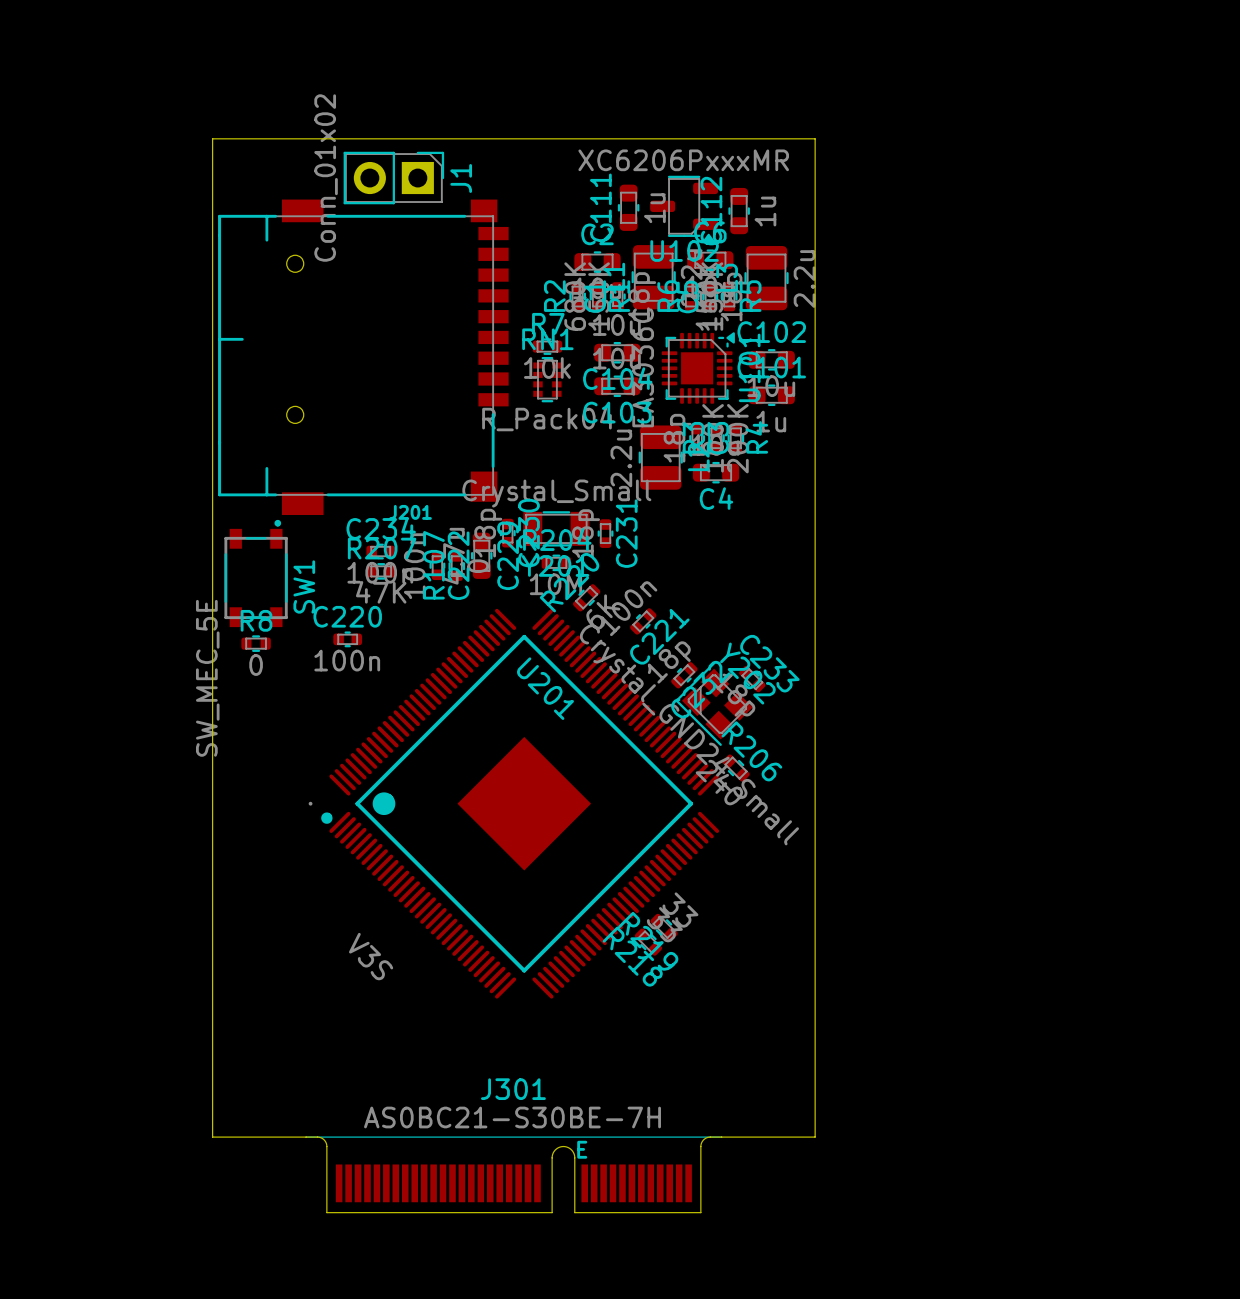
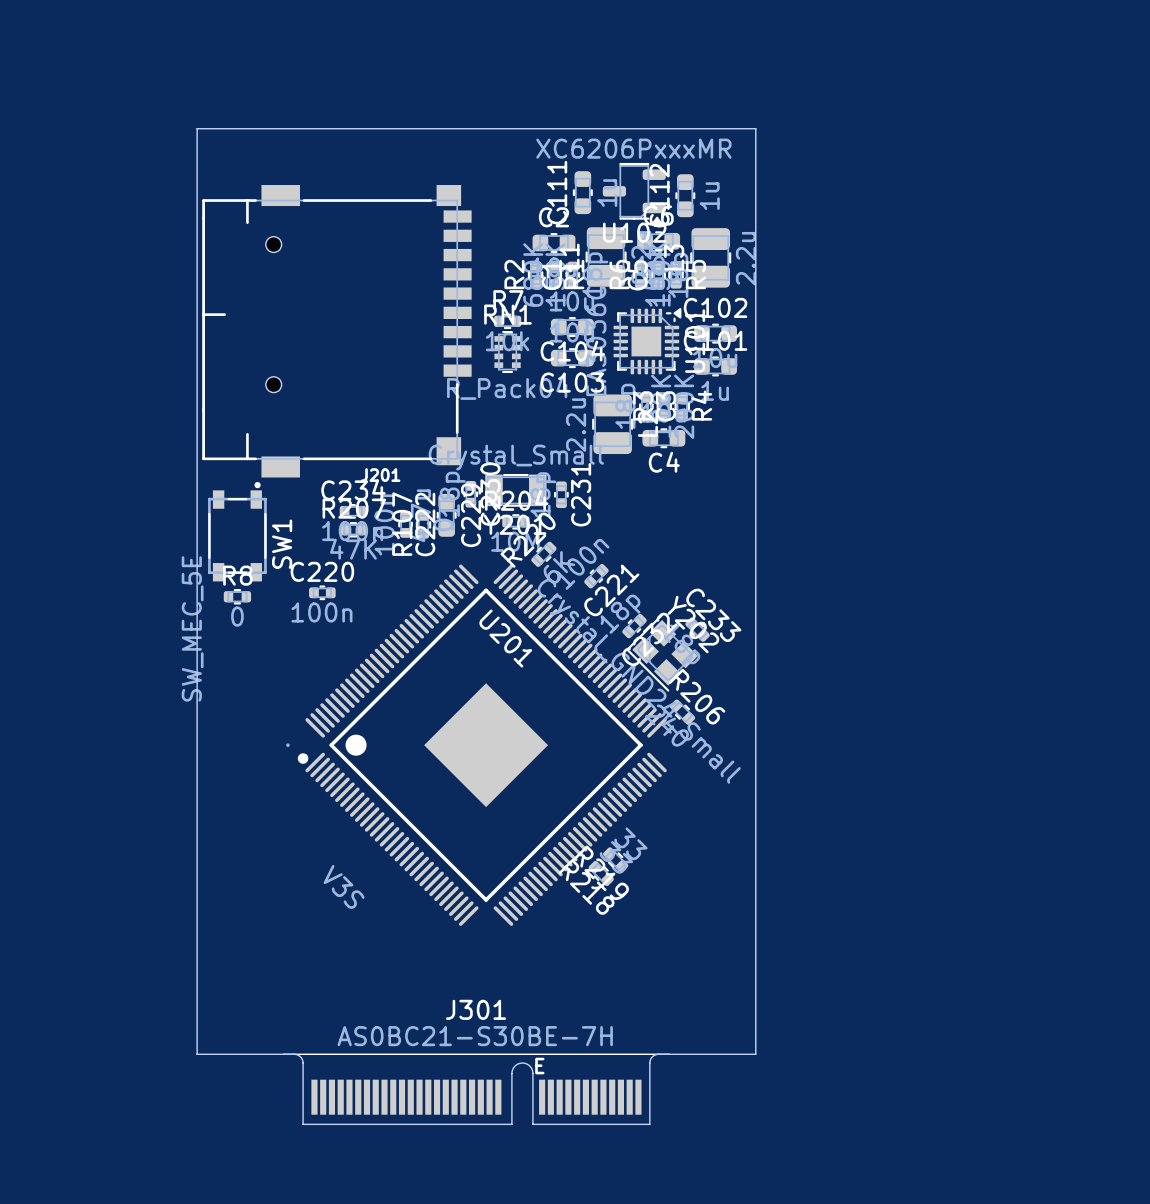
J1: Conn_01x02 (393, 178) -> none

